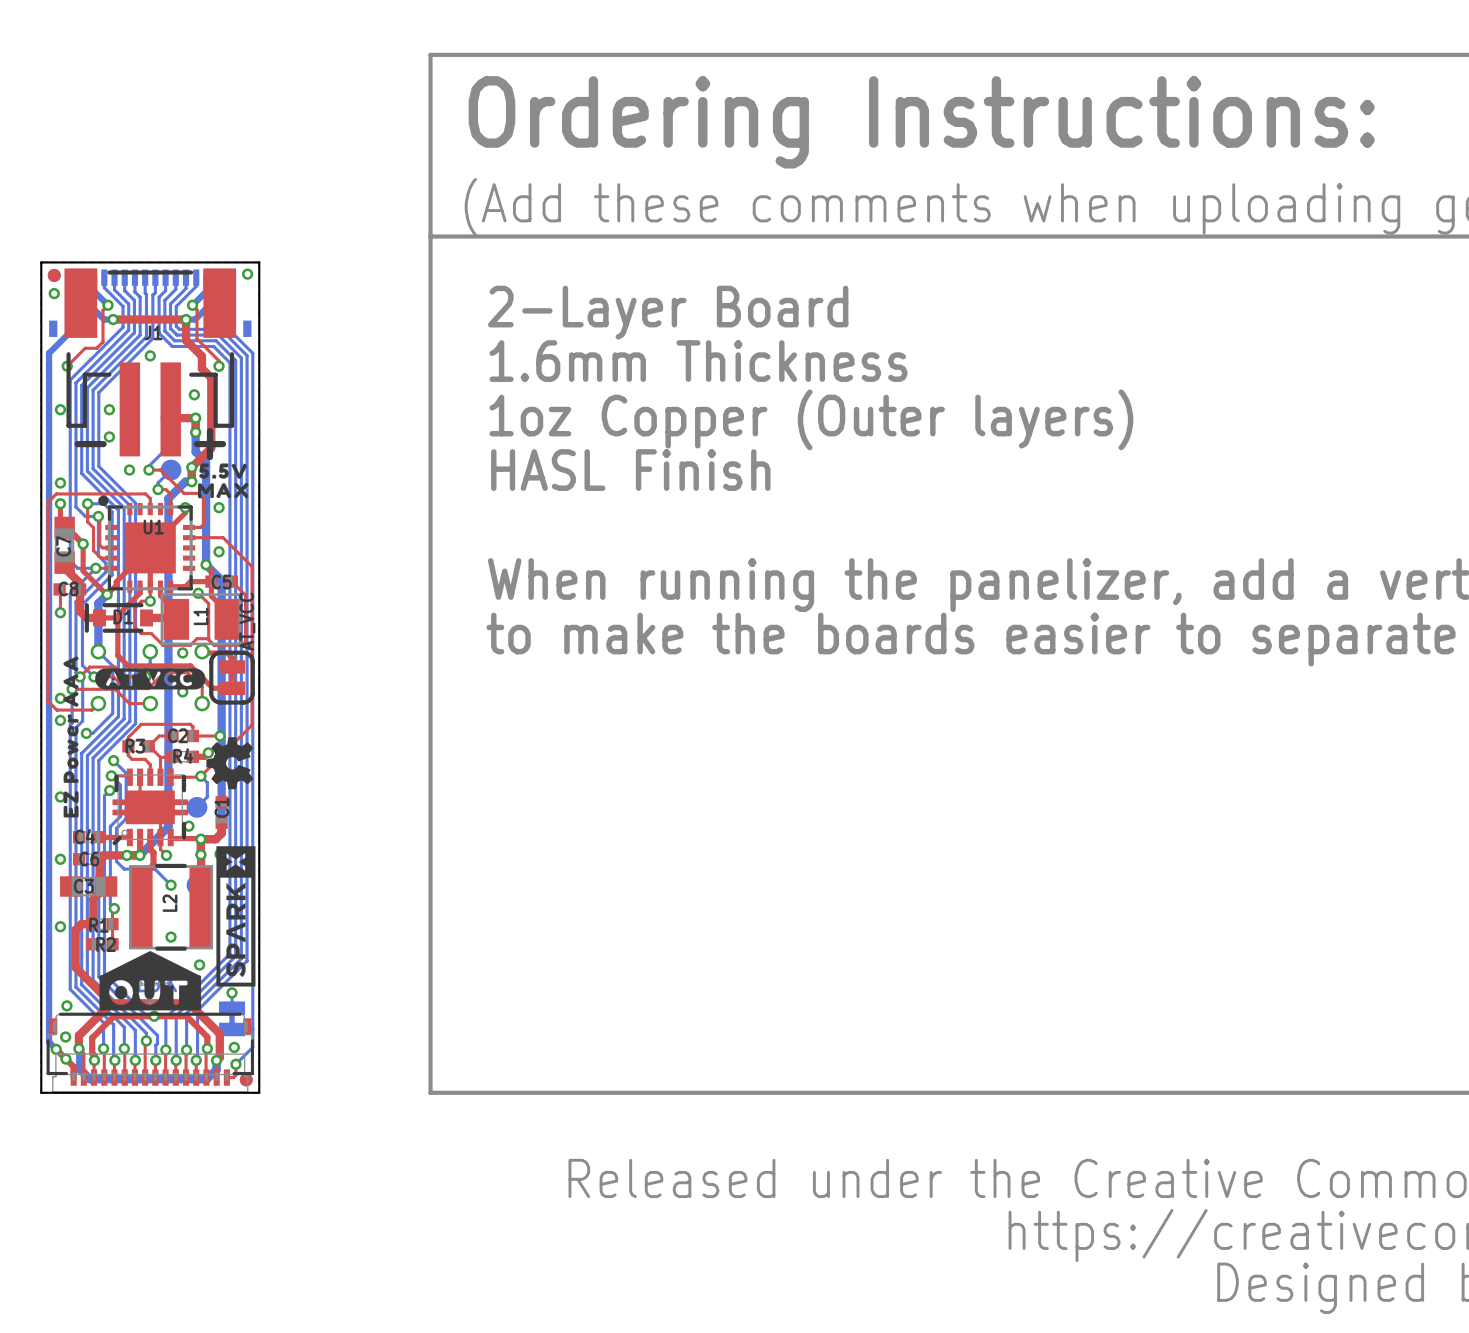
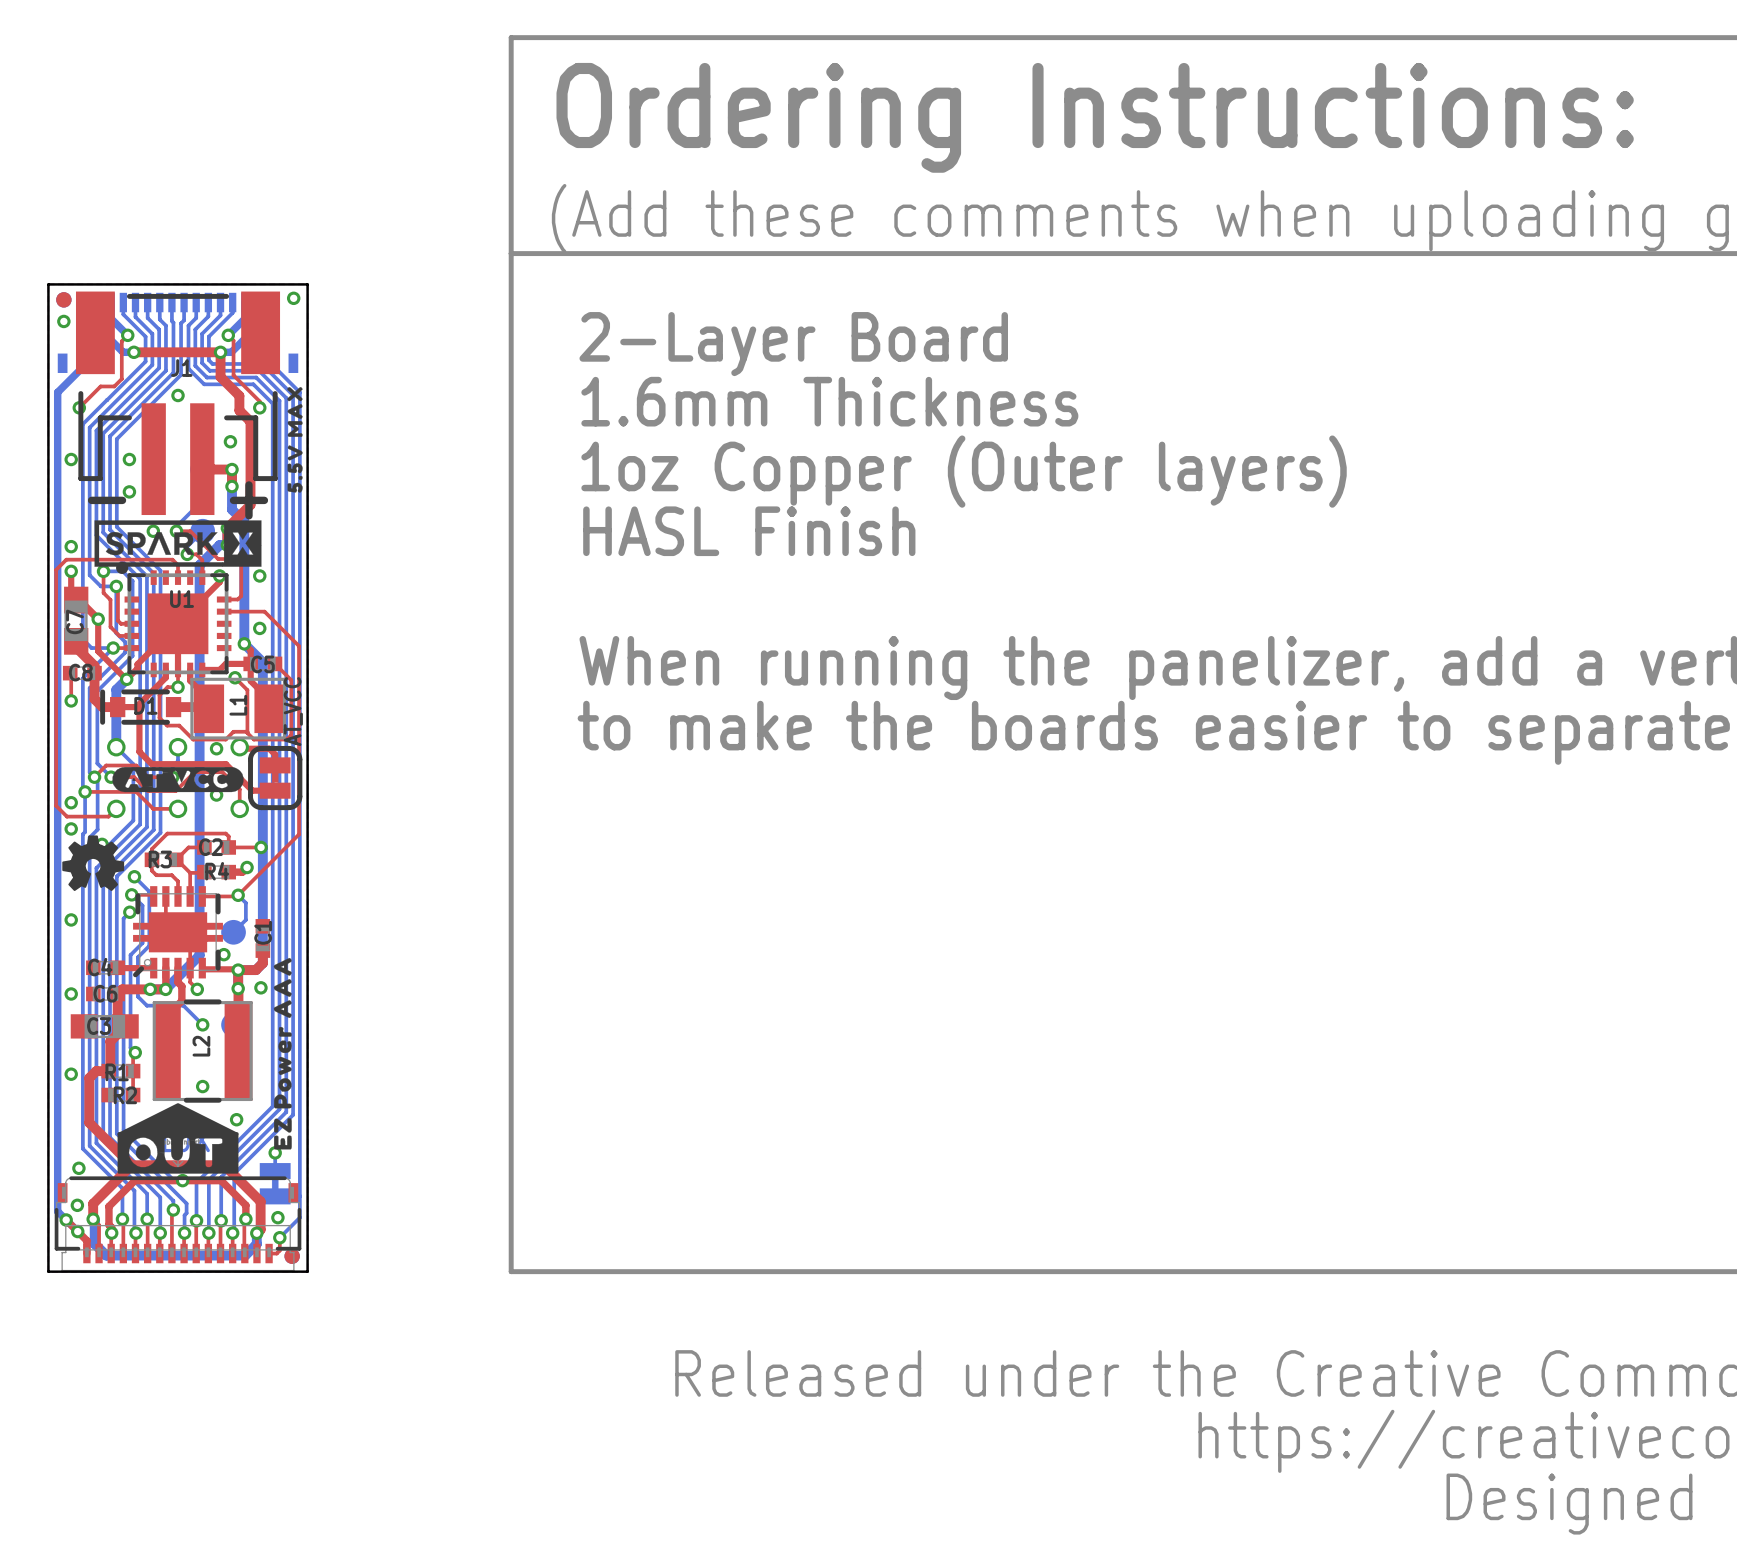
drawing: none -> [287, 387, 303, 493]
drawing: none -> [94, 520, 262, 567]
drawing: [197, 463, 249, 499] -> none
drawing: none -> [62, 835, 125, 892]
drawing position: (71, 736) -> (282, 1053)
drawing: [206, 737, 254, 790] -> none
drawing: [216, 846, 256, 987] -> none

